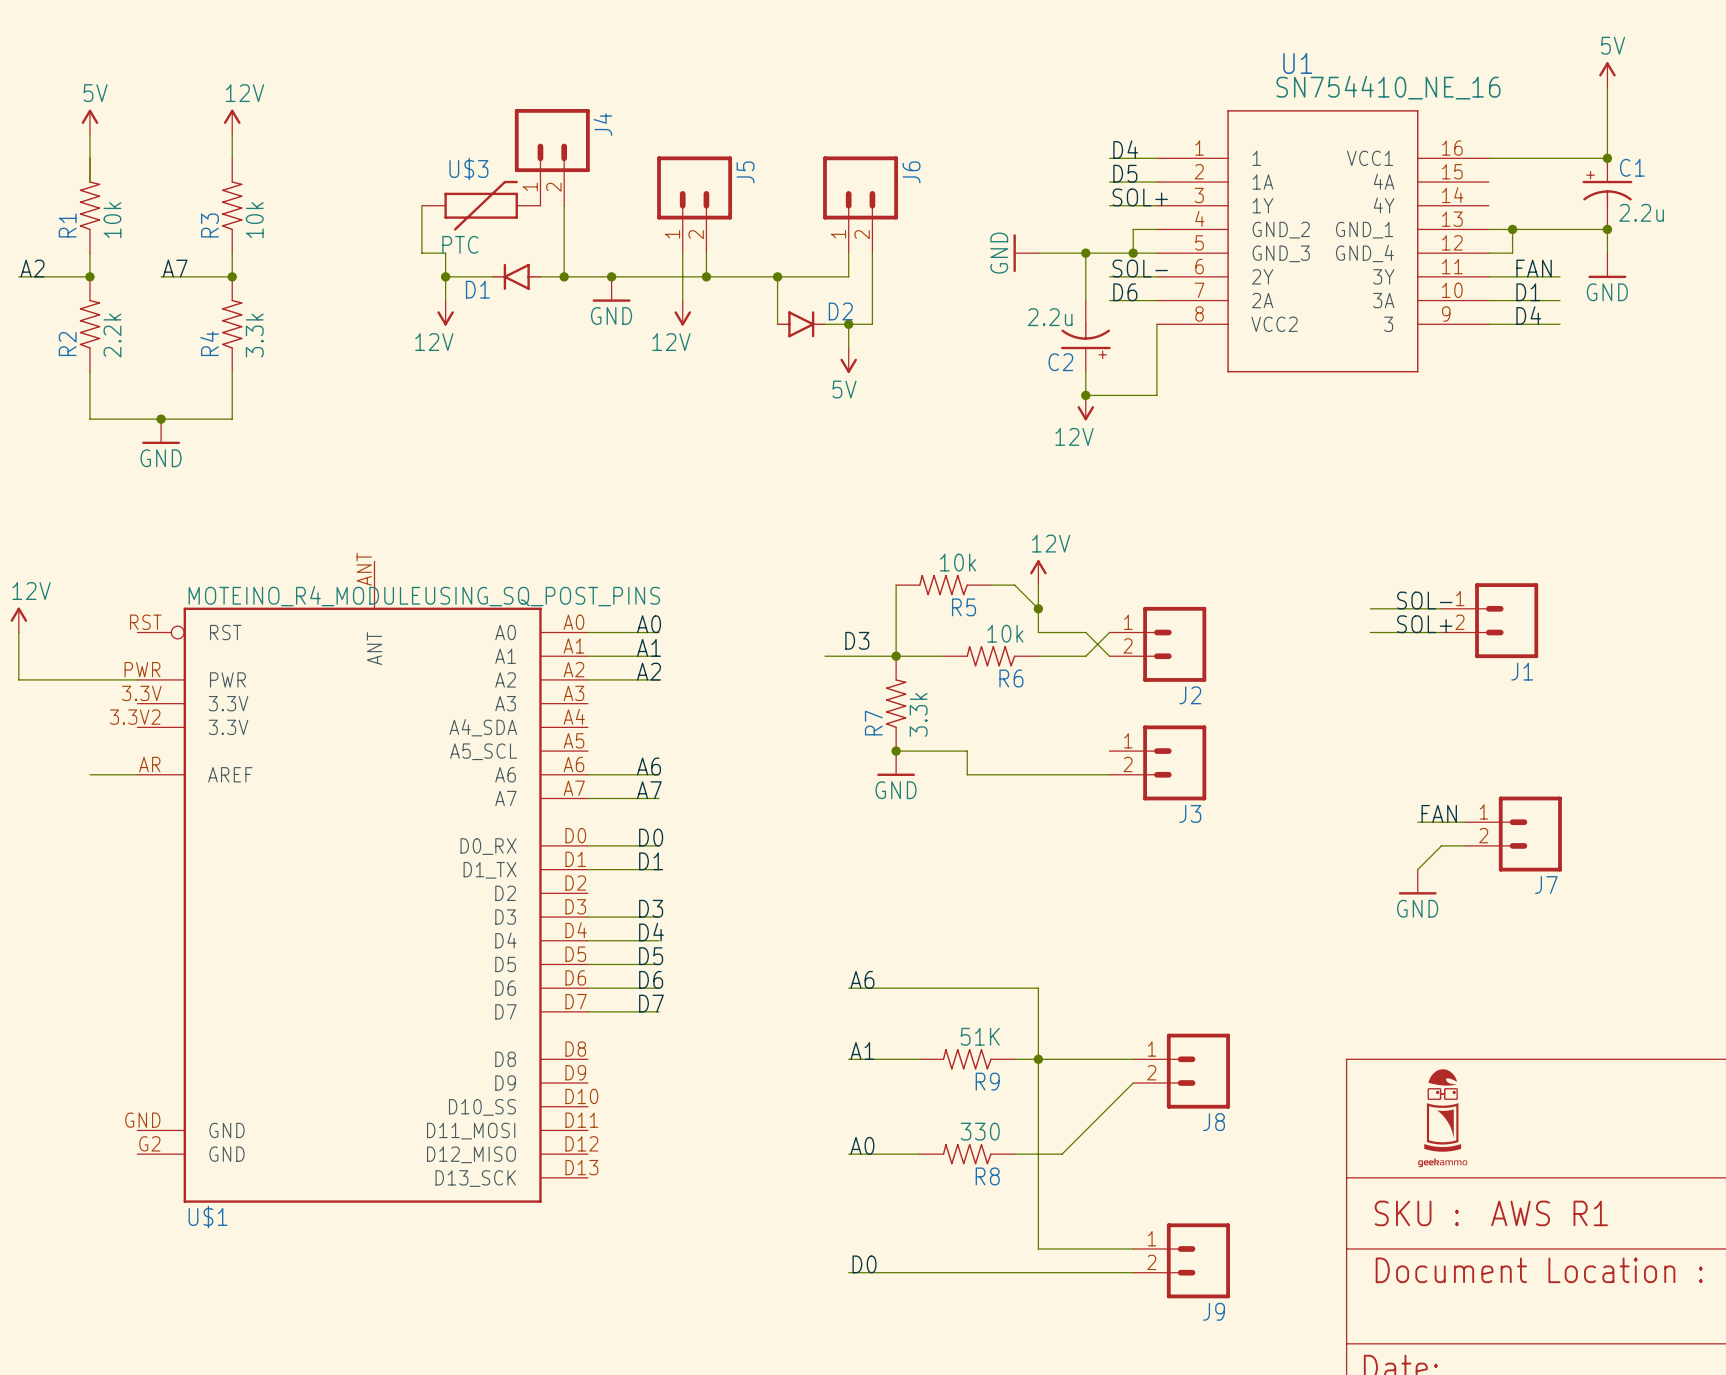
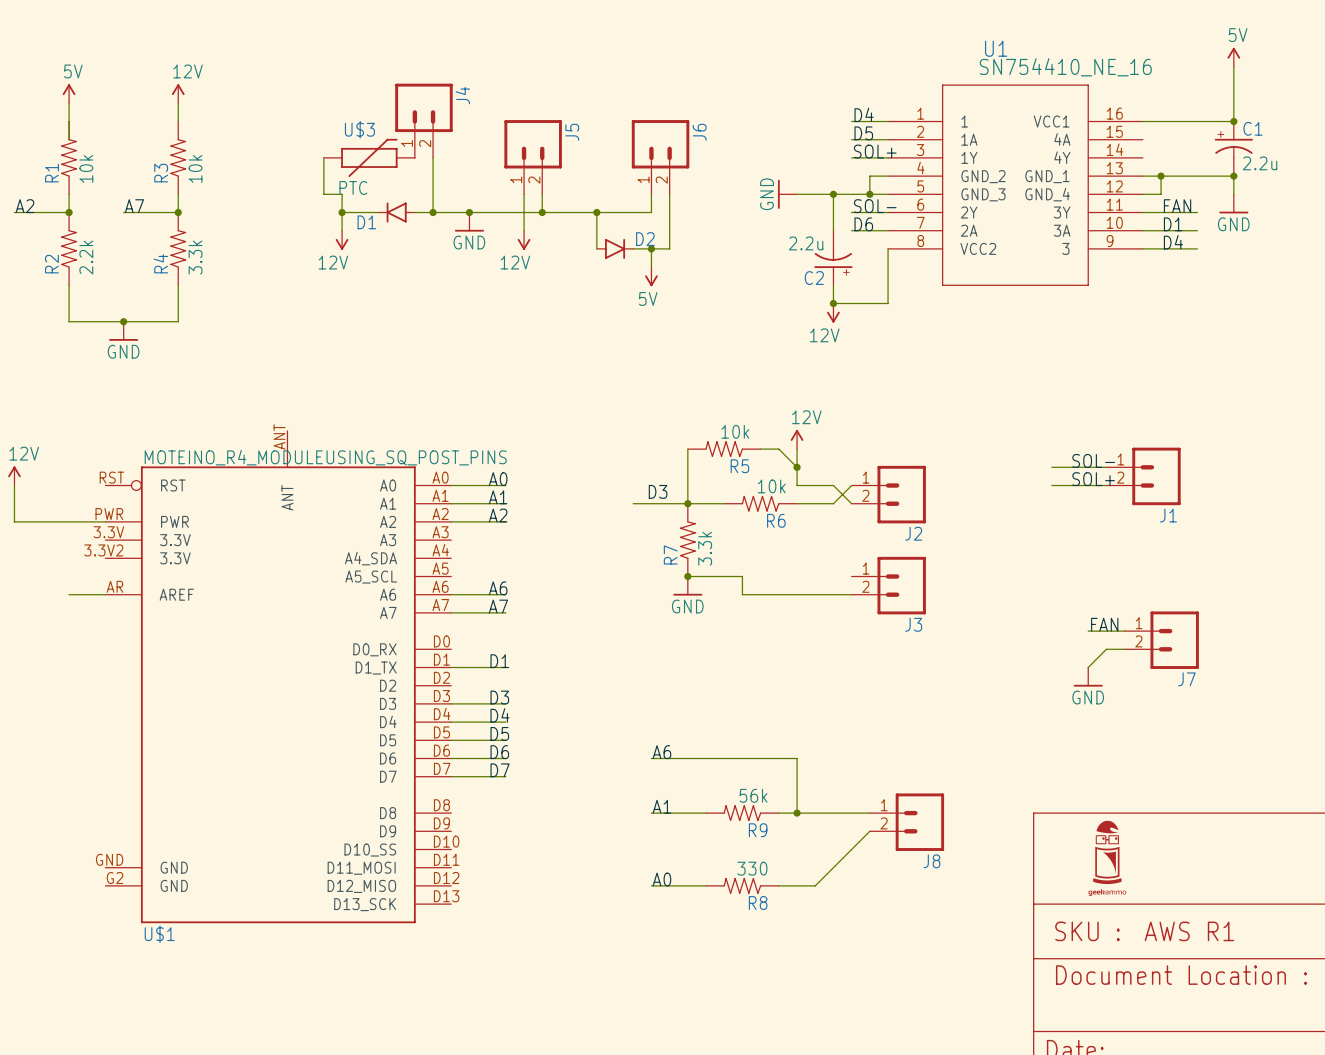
label: D0 (651, 837) -> none
wire: (587, 845) (659, 845) -> none
R9 value: 51K (980, 1036) -> 56k (753, 795)
wire: (1038, 1059) (1038, 1248) (1133, 1248) -> none
J9: (1181, 1260) -> none
label: D0 (864, 1264) -> none
wire: (848, 1272) (1133, 1272) -> none

